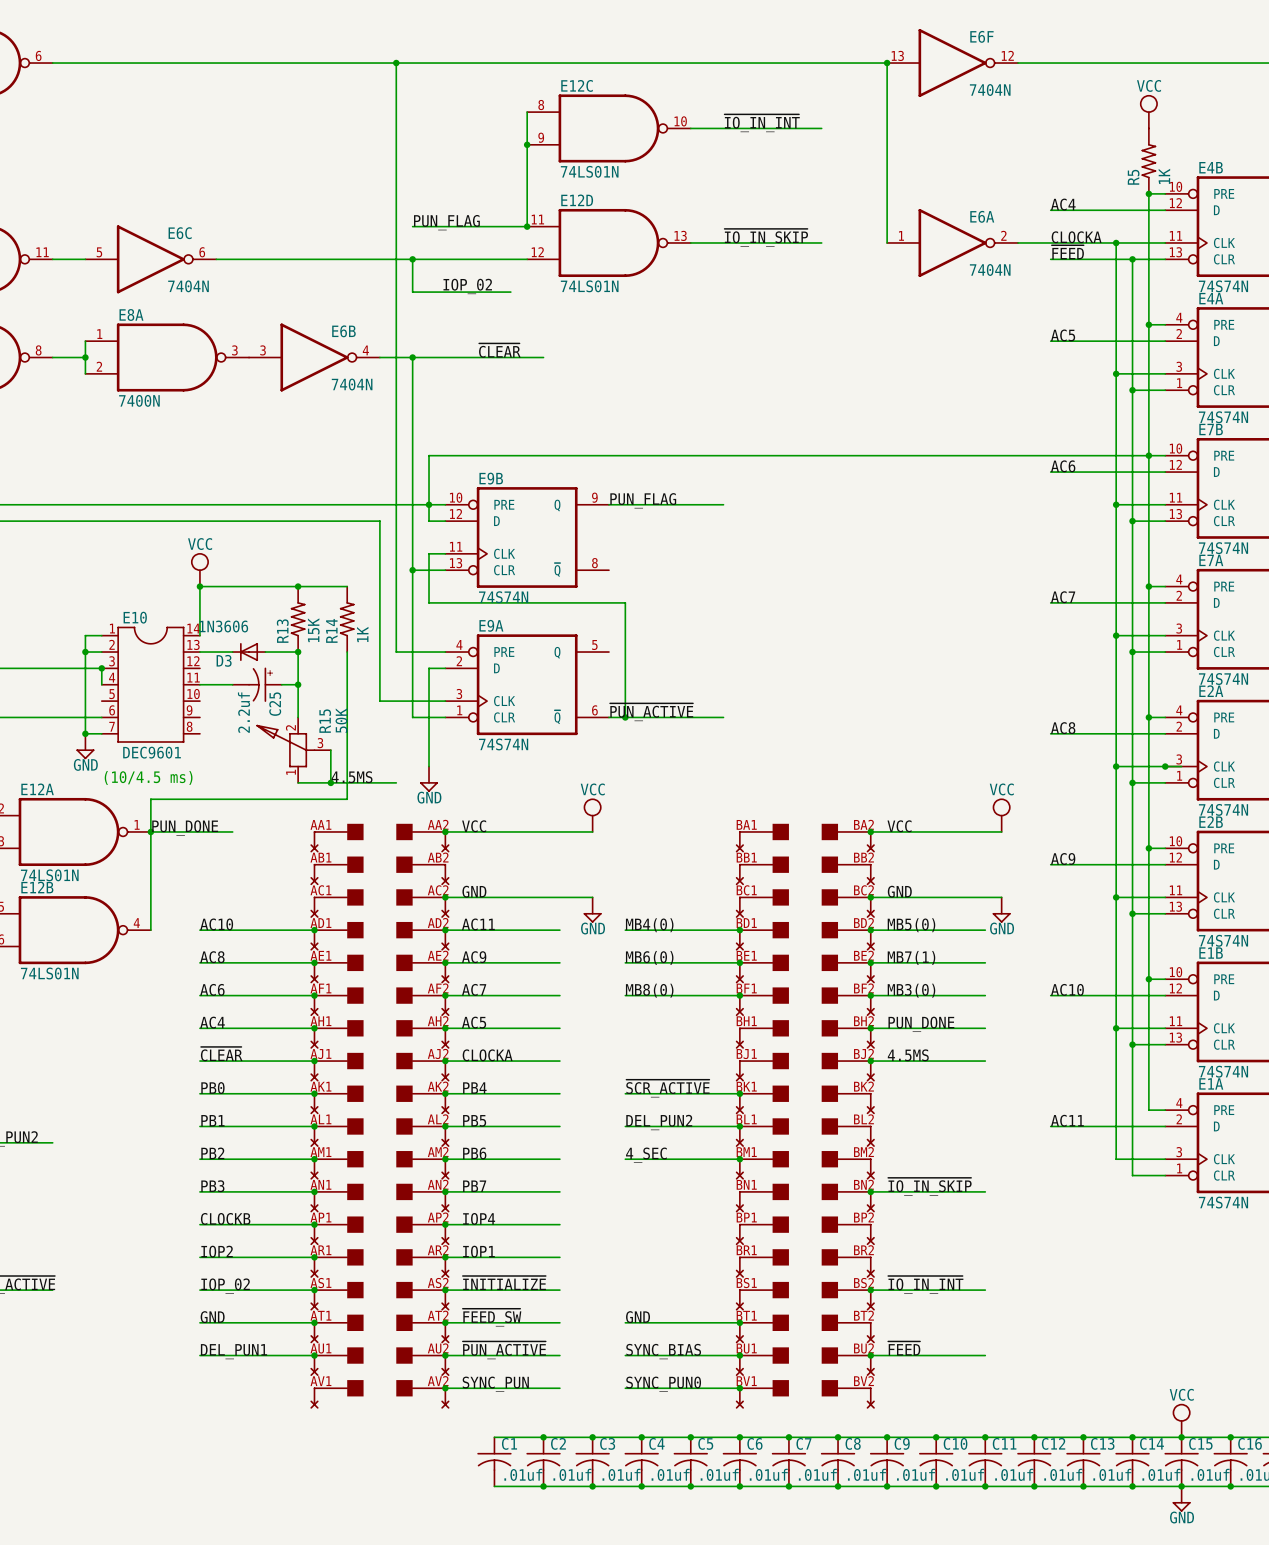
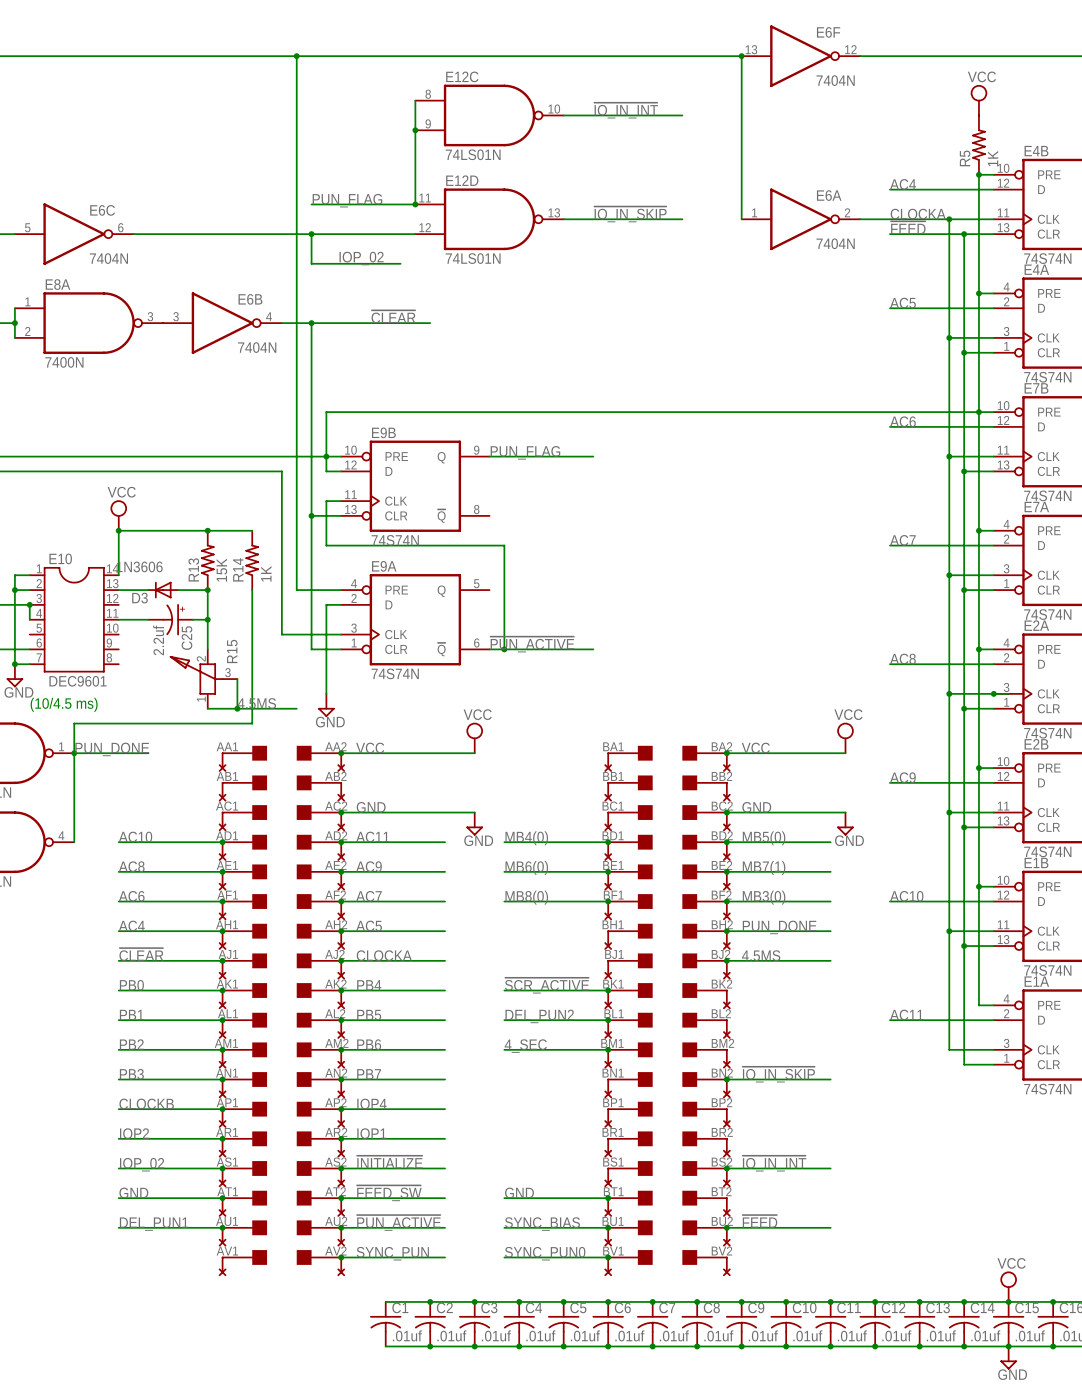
R15 value: 50K (341, 720) -> none

